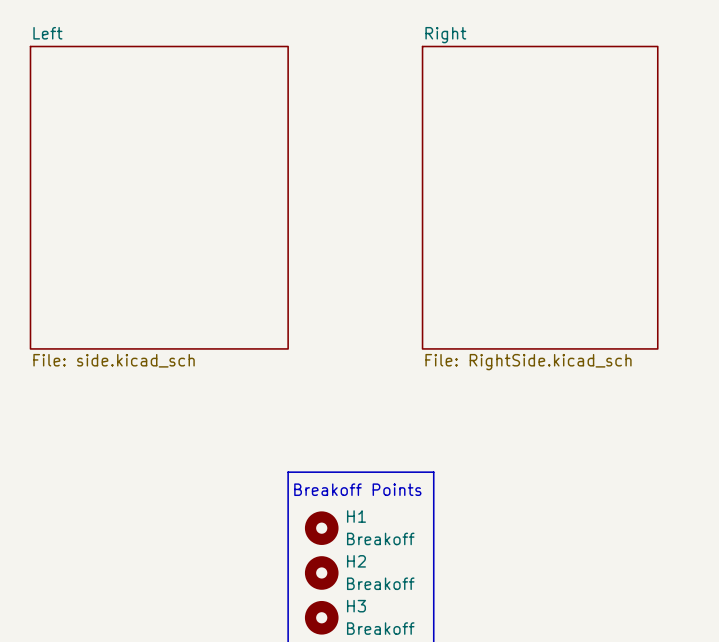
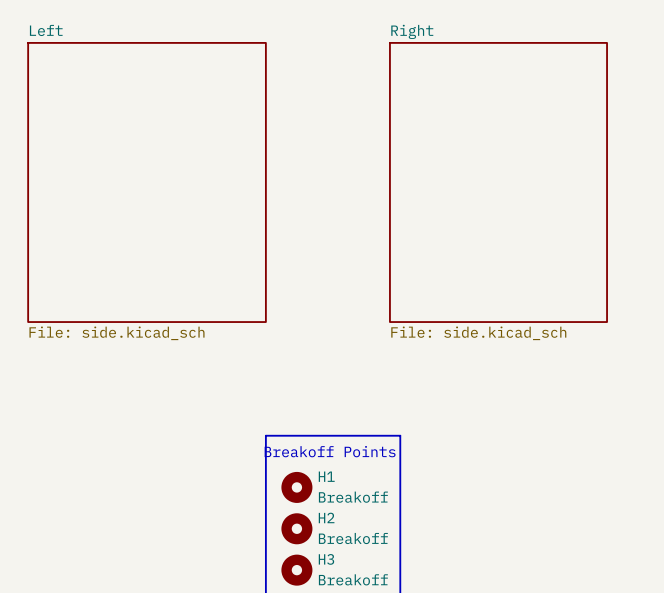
sheet Right value: File: RightSide.kicad_sch (528, 362) -> File: side.kicad_sch (478, 333)

